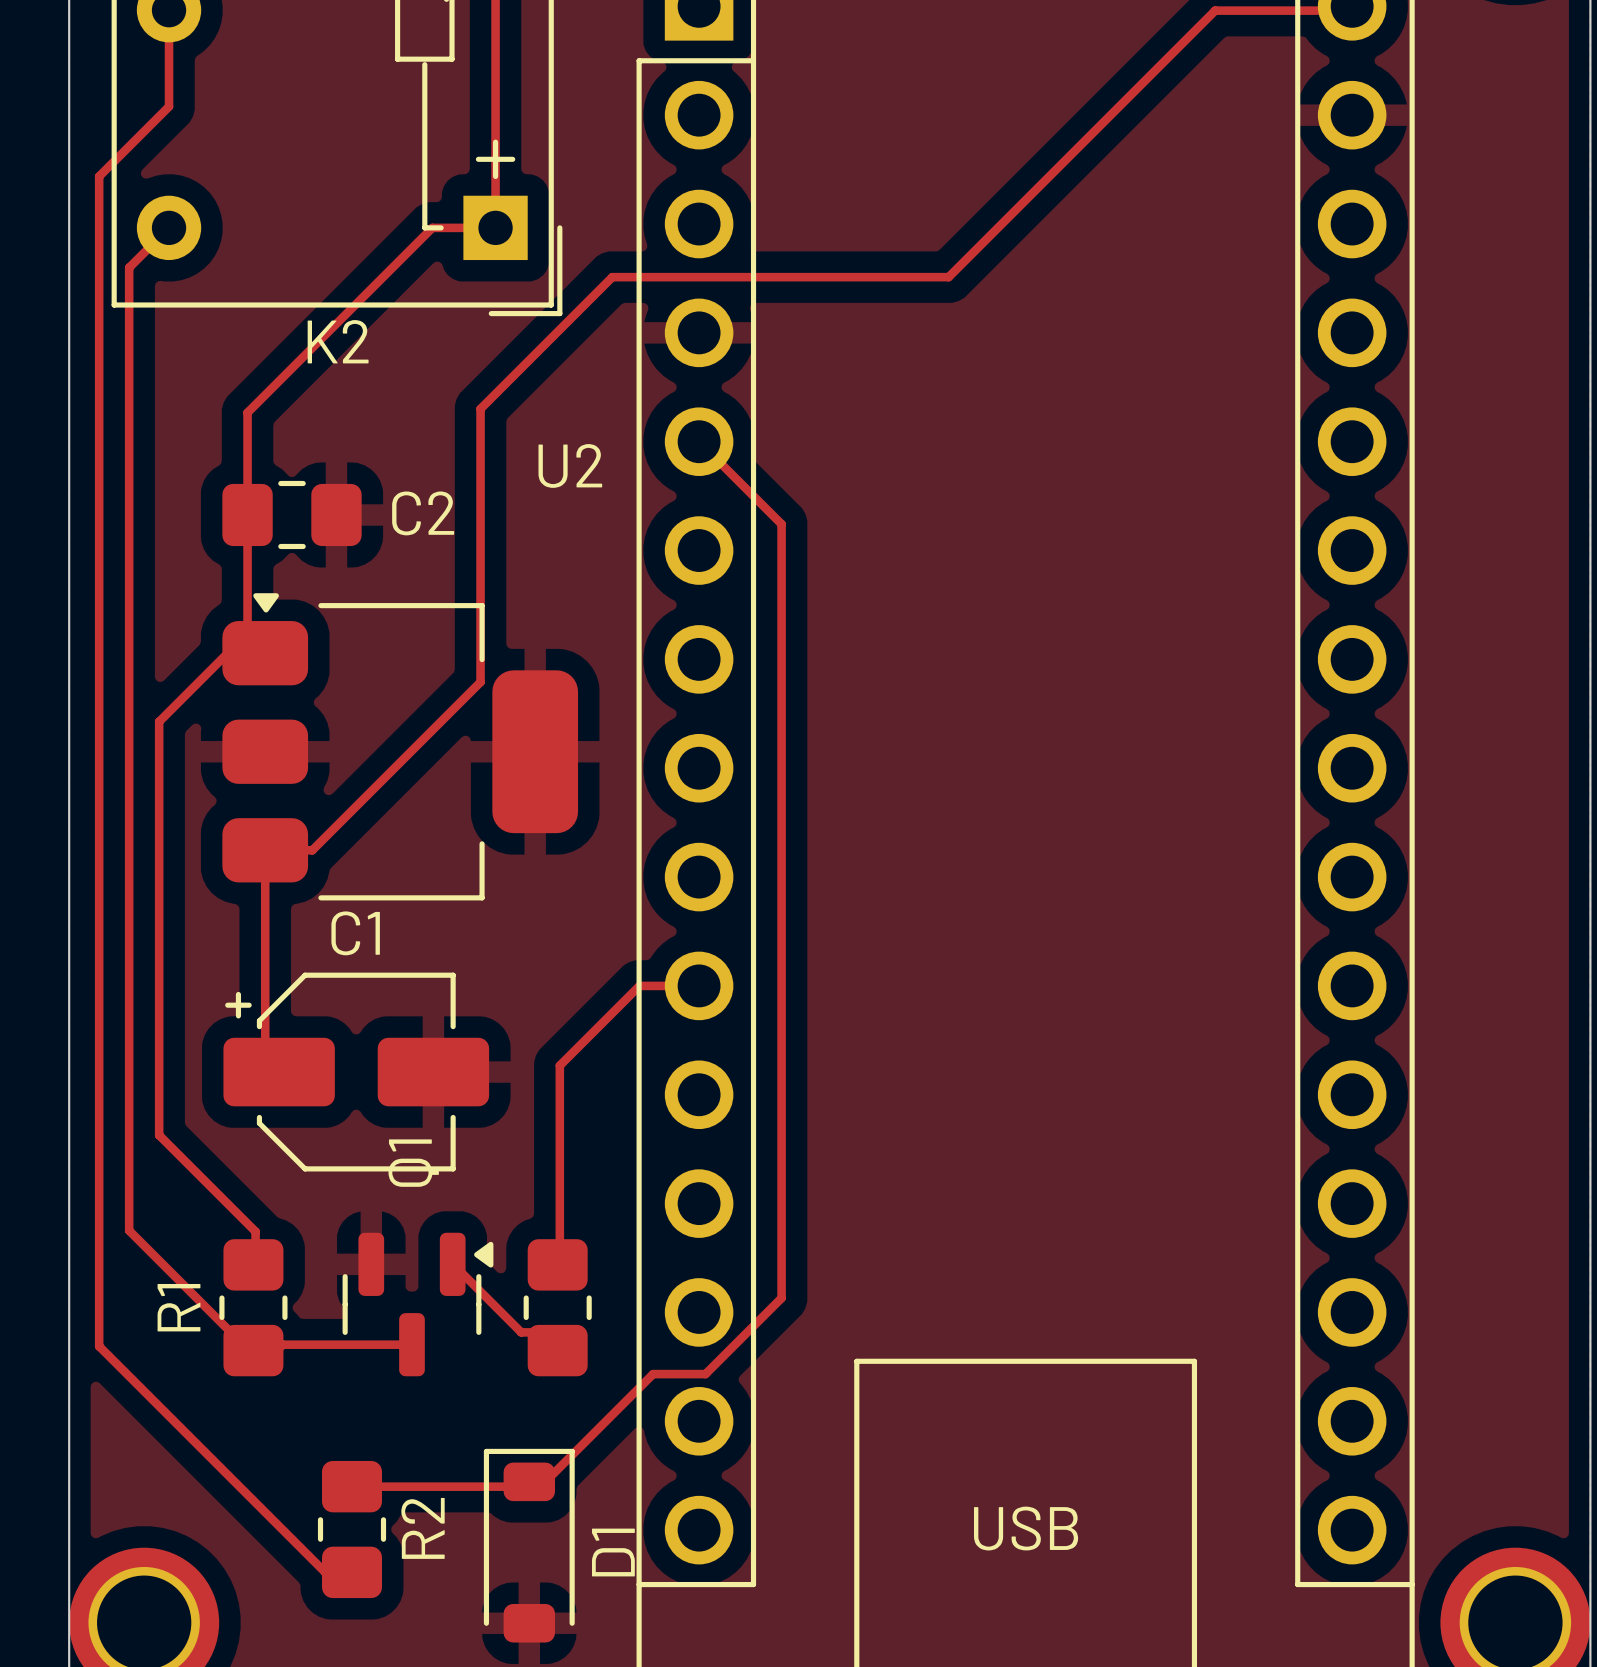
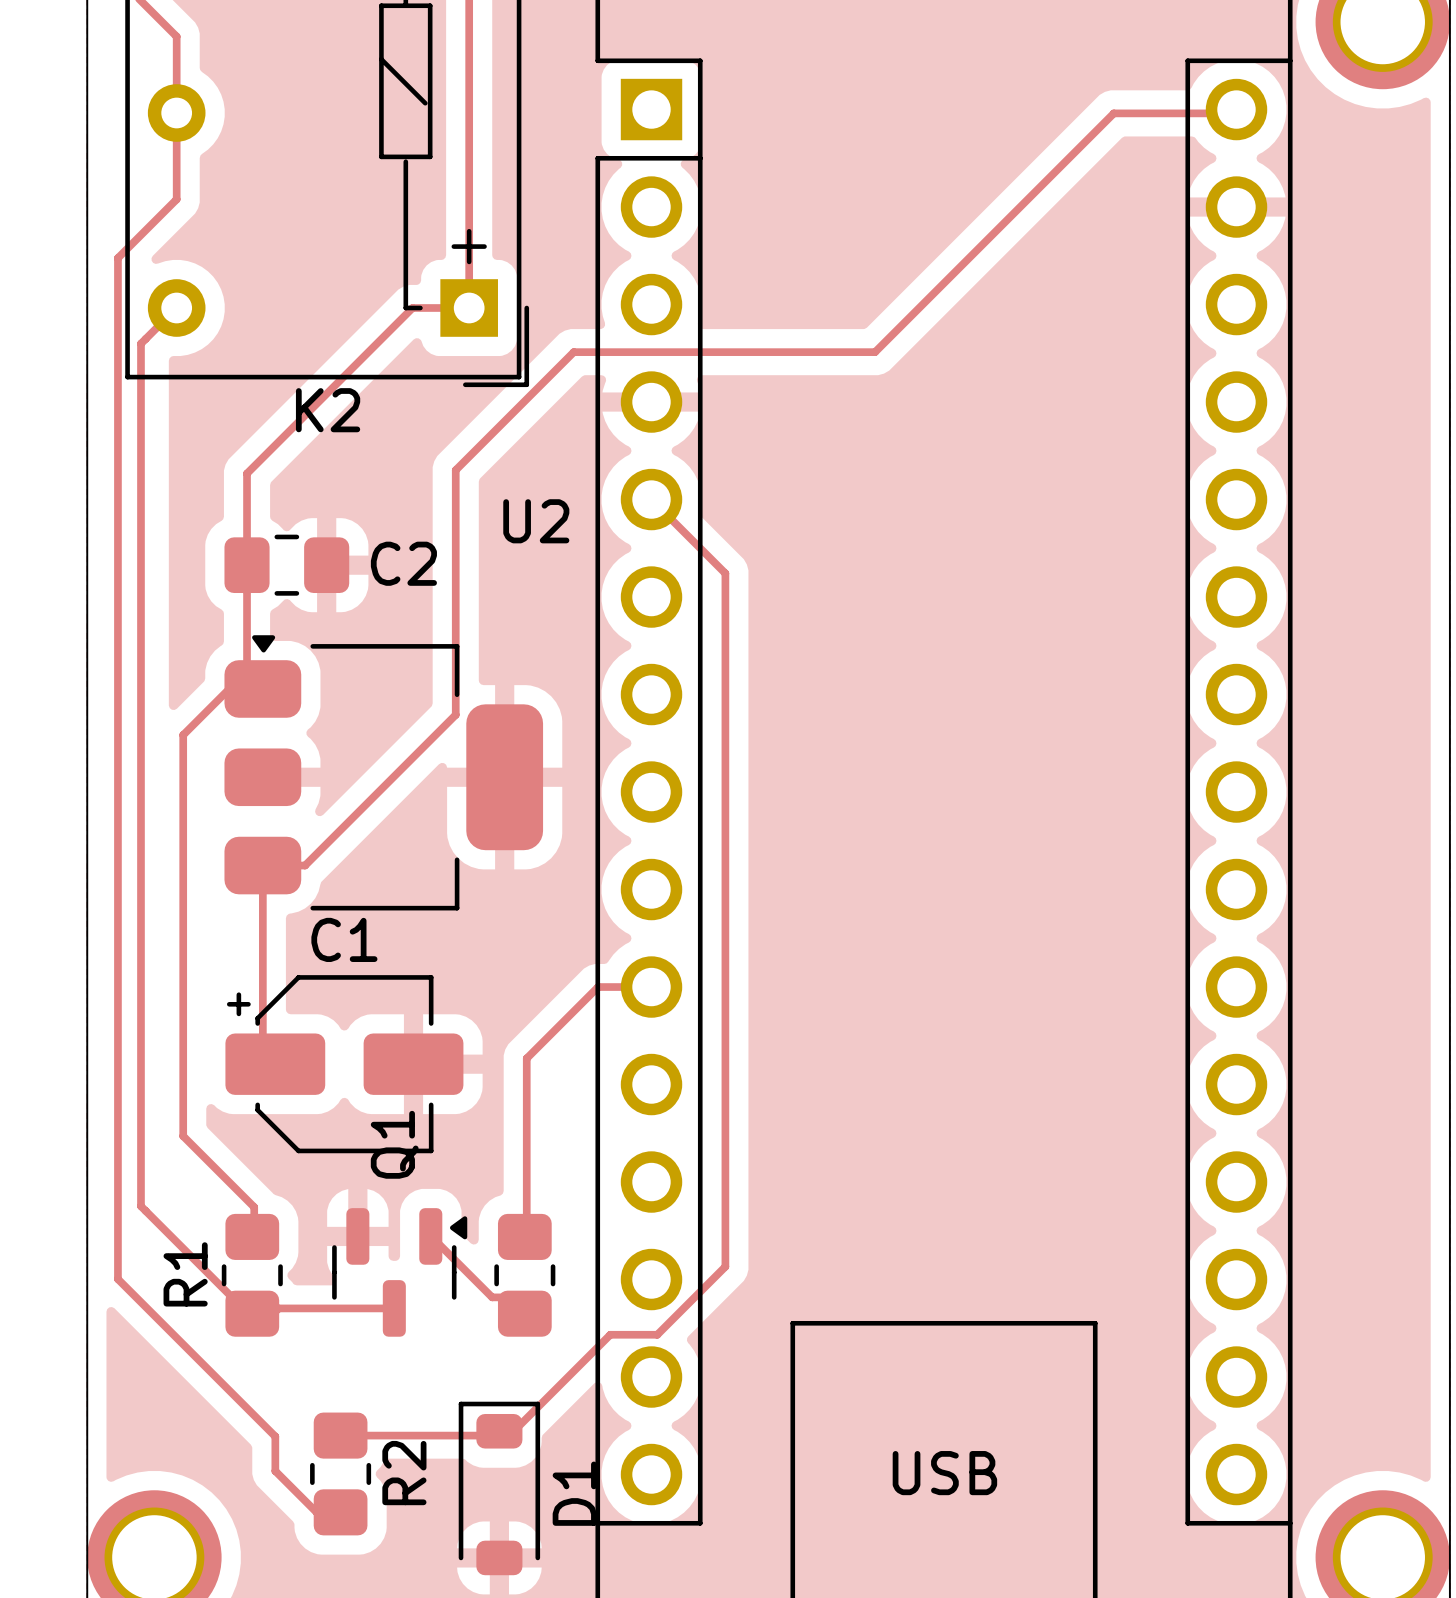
top track: (103, 172) (99, 176) (99, 1346) (279, 1526) -> (117, 258) (117, 1279) (275, 1436) (275, 1471)
top track: (176, 704) (159, 721) (159, 1135) (176, 1152) -> (183, 735) (183, 1136)

